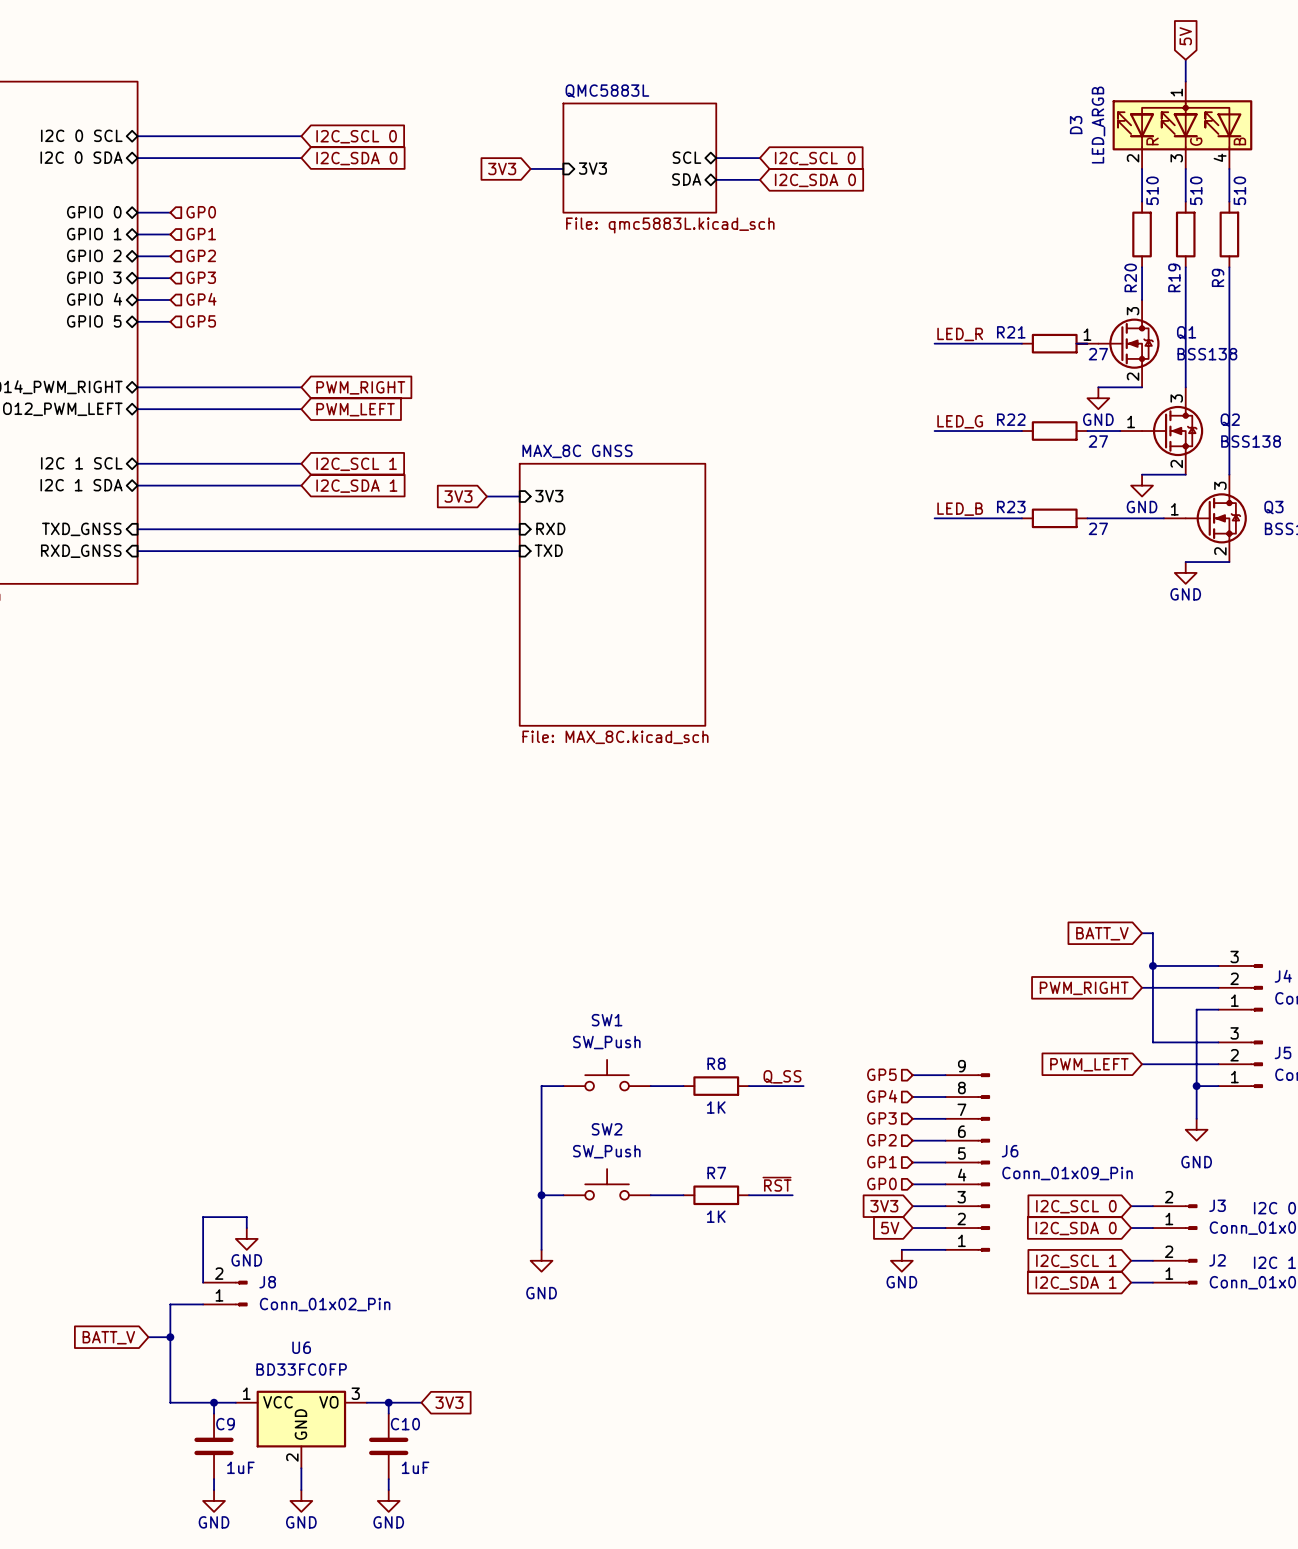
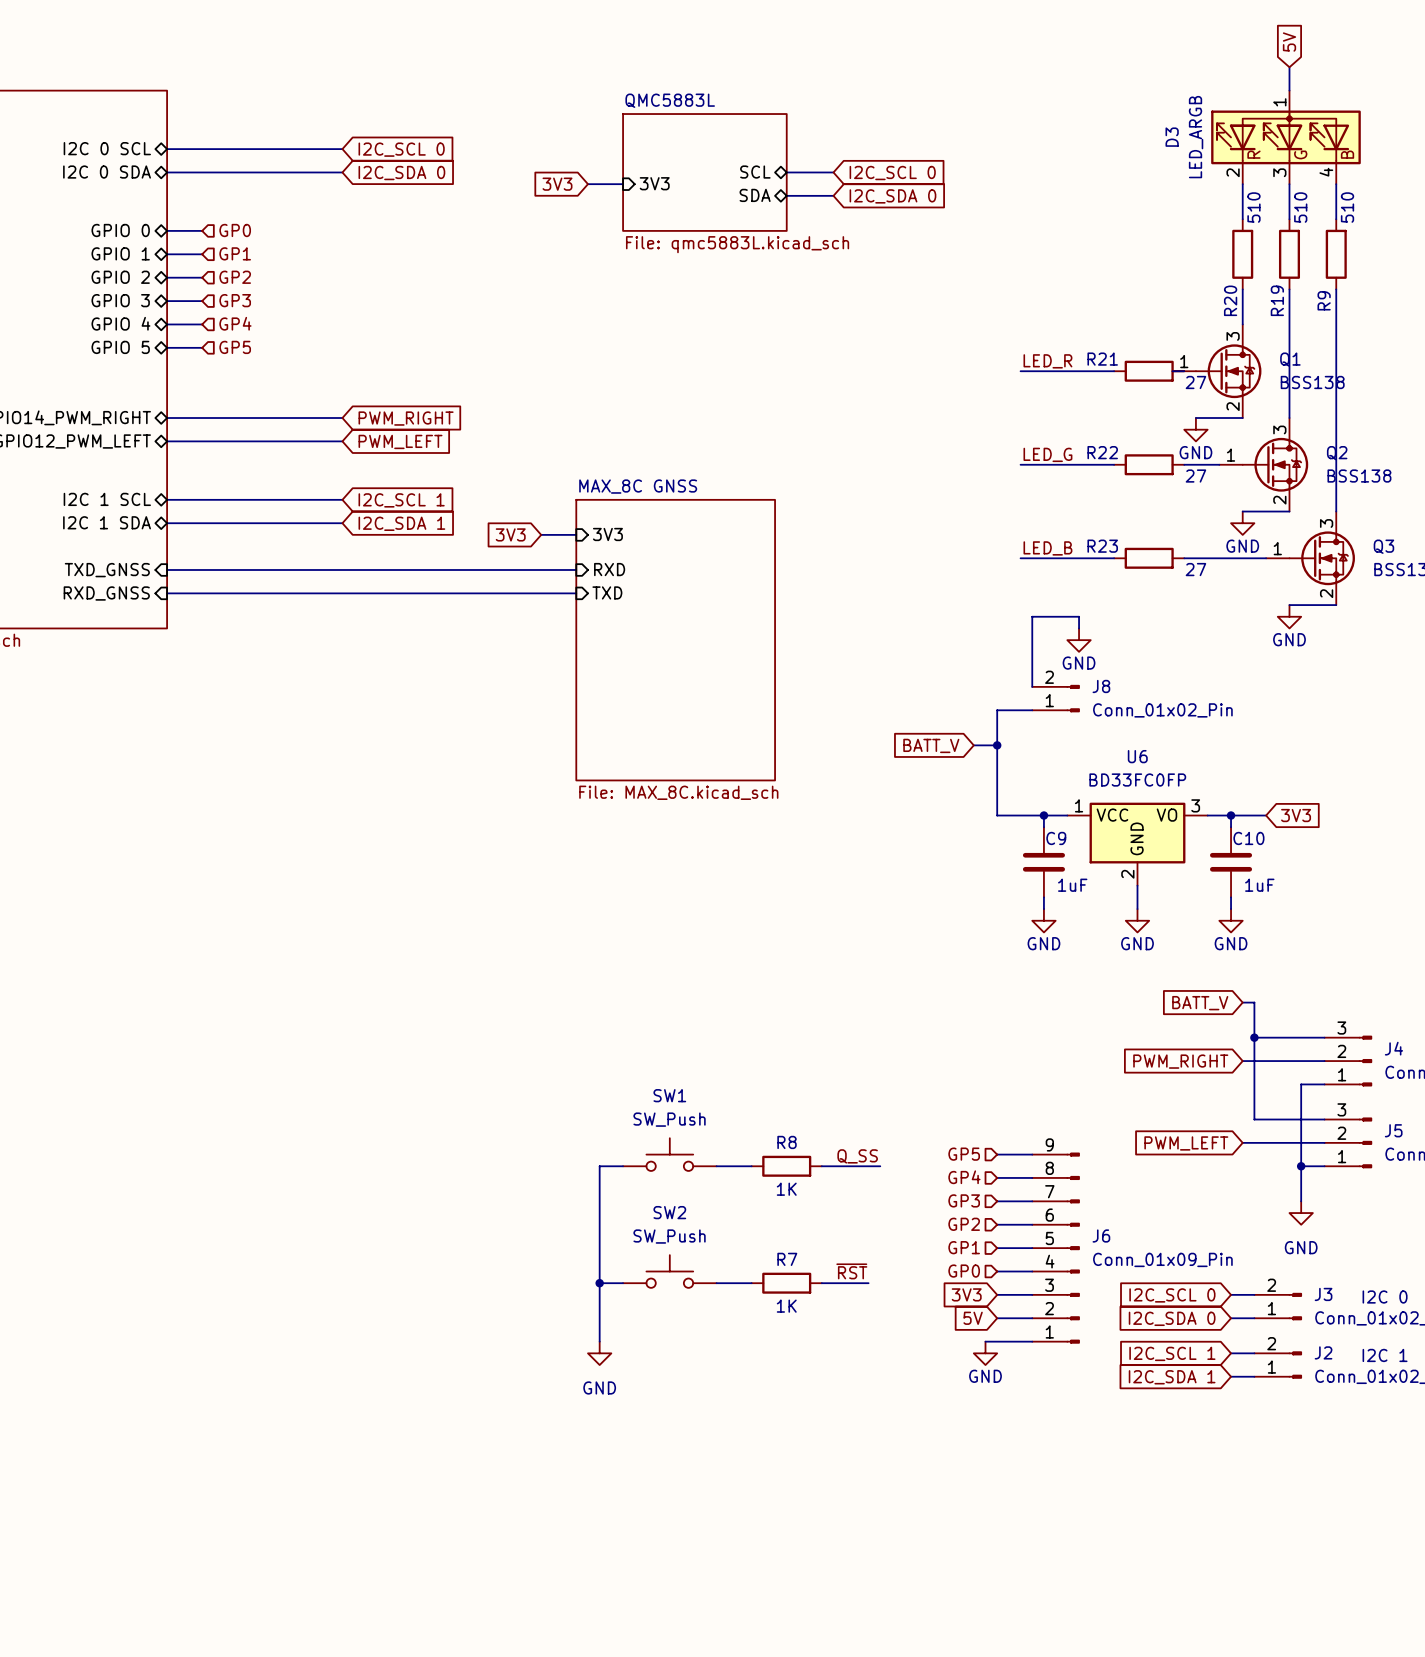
wire: none -> (1079, 628) (1079, 616) (1032, 616) (1032, 686)
power symbol: none -> GND (1079, 640)
wire: none -> (1032, 710) (997, 710) (997, 815) (1067, 815)
global label: none -> BATT_V (931, 745)
wire: none -> (973, 745) (997, 745)
junction: none -> (997, 745)
wire: none -> (1043, 815) (1043, 827)
junction: none -> (1043, 815)
wire: none -> (1207, 815) (1266, 815)
wire: none -> (1231, 815) (1231, 827)
junction: none -> (1231, 815)
global label: none -> 3V3 (1296, 815)
wire: none -> (1137, 885) (1137, 909)
wire: none -> (1043, 897) (1043, 909)
wire: none -> (1231, 897) (1231, 909)
power symbol: none -> GND (1043, 920)
power symbol: none -> GND (1137, 920)
power symbol: none -> GND (1231, 920)
wire: (246, 1228) (246, 1217) (203, 1217) (203, 1282) -> none
power symbol: GND (246, 1238) -> none
J8 position: (225, 1293) -> (1056, 698)
wire: (203, 1304) (170, 1304) (170, 1402) (235, 1402) -> none
global label: BATT_V (108, 1337) -> none
wire: (148, 1337) (170, 1337) -> none
junction: (170, 1337) -> none
wire: (214, 1402) (214, 1413) -> none
junction: (214, 1402) -> none
wire: (366, 1402) (421, 1402) -> none
wire: (388, 1402) (388, 1413) -> none
junction: (388, 1402) -> none
global label: 3V3 (449, 1402) -> none
U6 position: (301, 1429) -> (1137, 844)
C9 position: (214, 1446) -> (1043, 862)
C10 position: (388, 1446) -> (1231, 862)
wire: (301, 1468) (301, 1490) -> none
wire: (214, 1479) (214, 1490) -> none
wire: (388, 1479) (388, 1490) -> none
power symbol: GND (214, 1500) -> none
power symbol: GND (301, 1500) -> none
power symbol: GND (388, 1500) -> none

